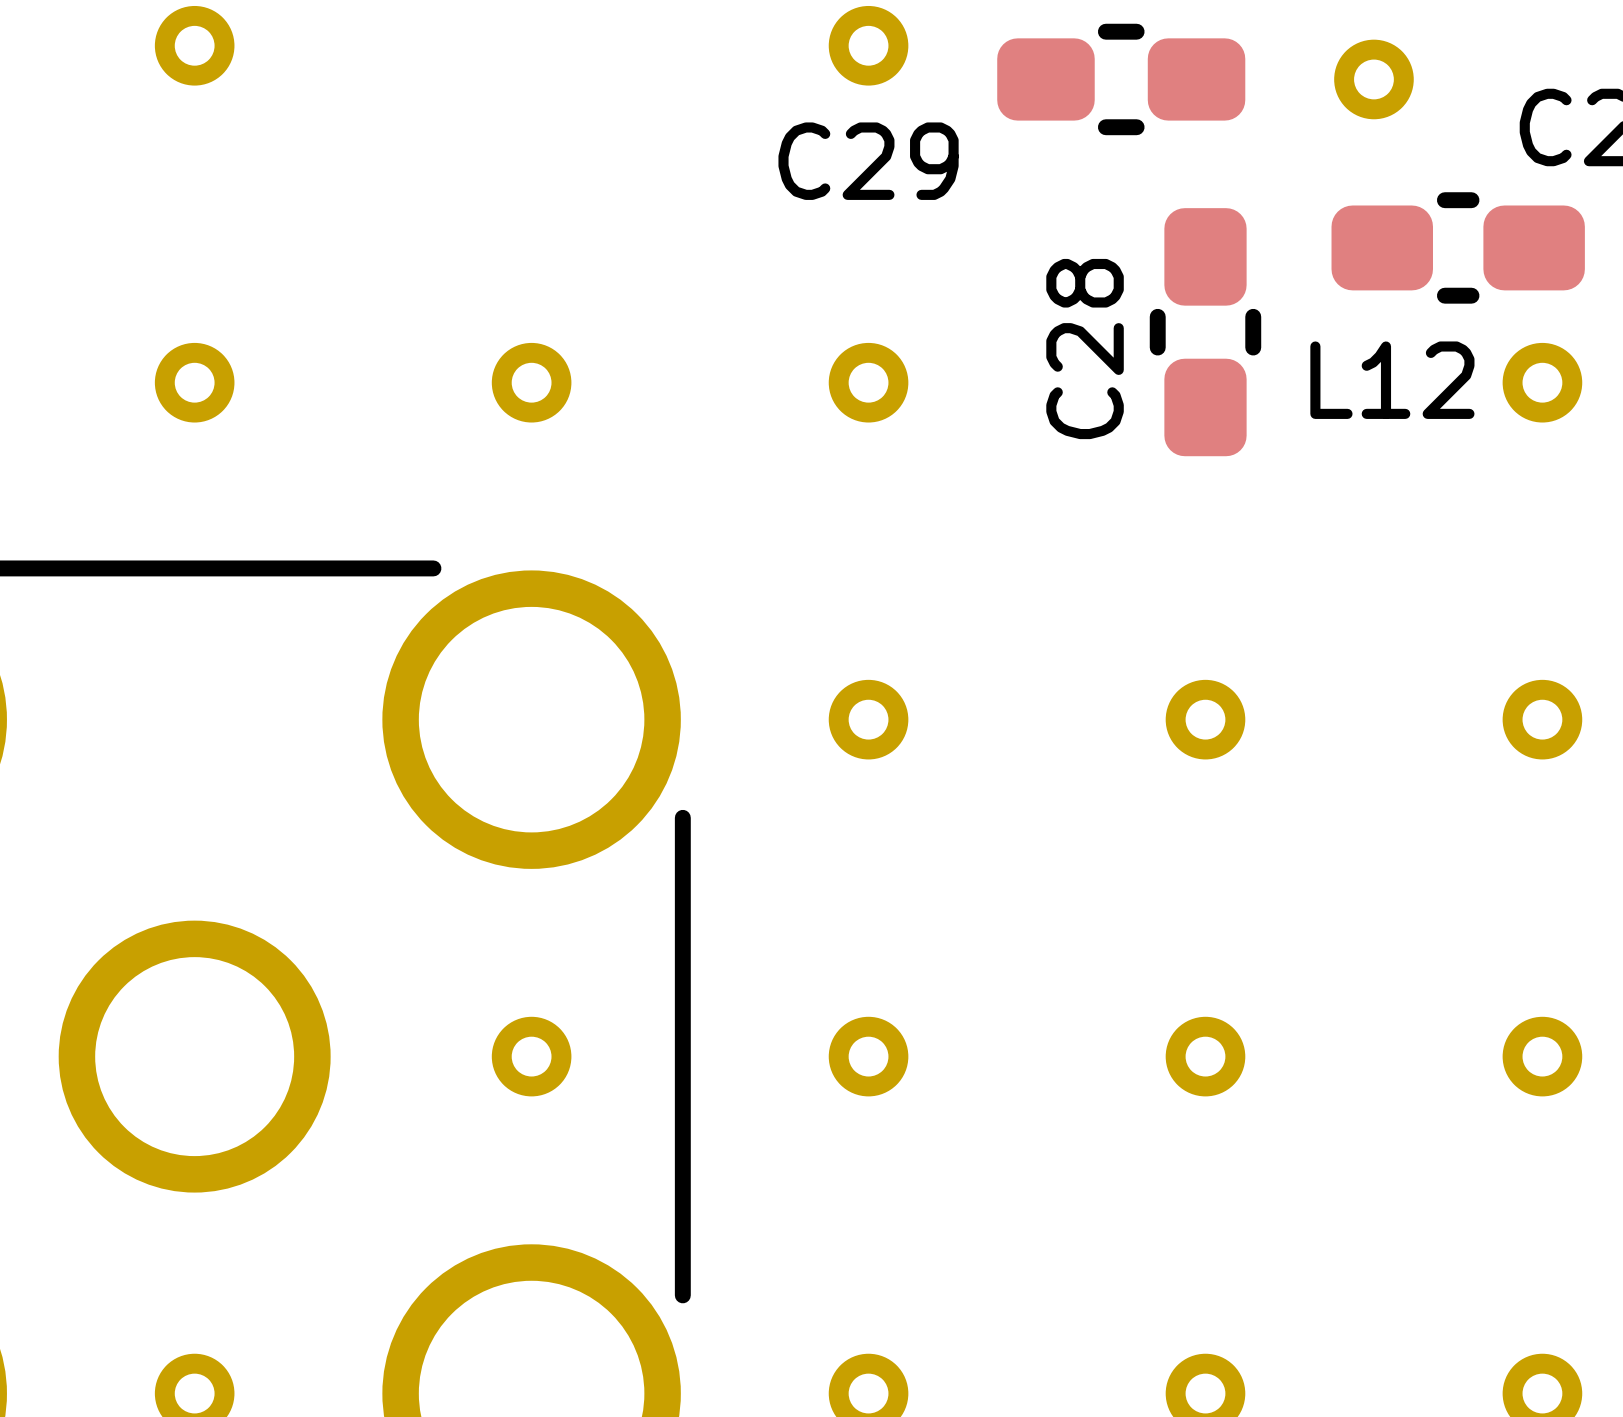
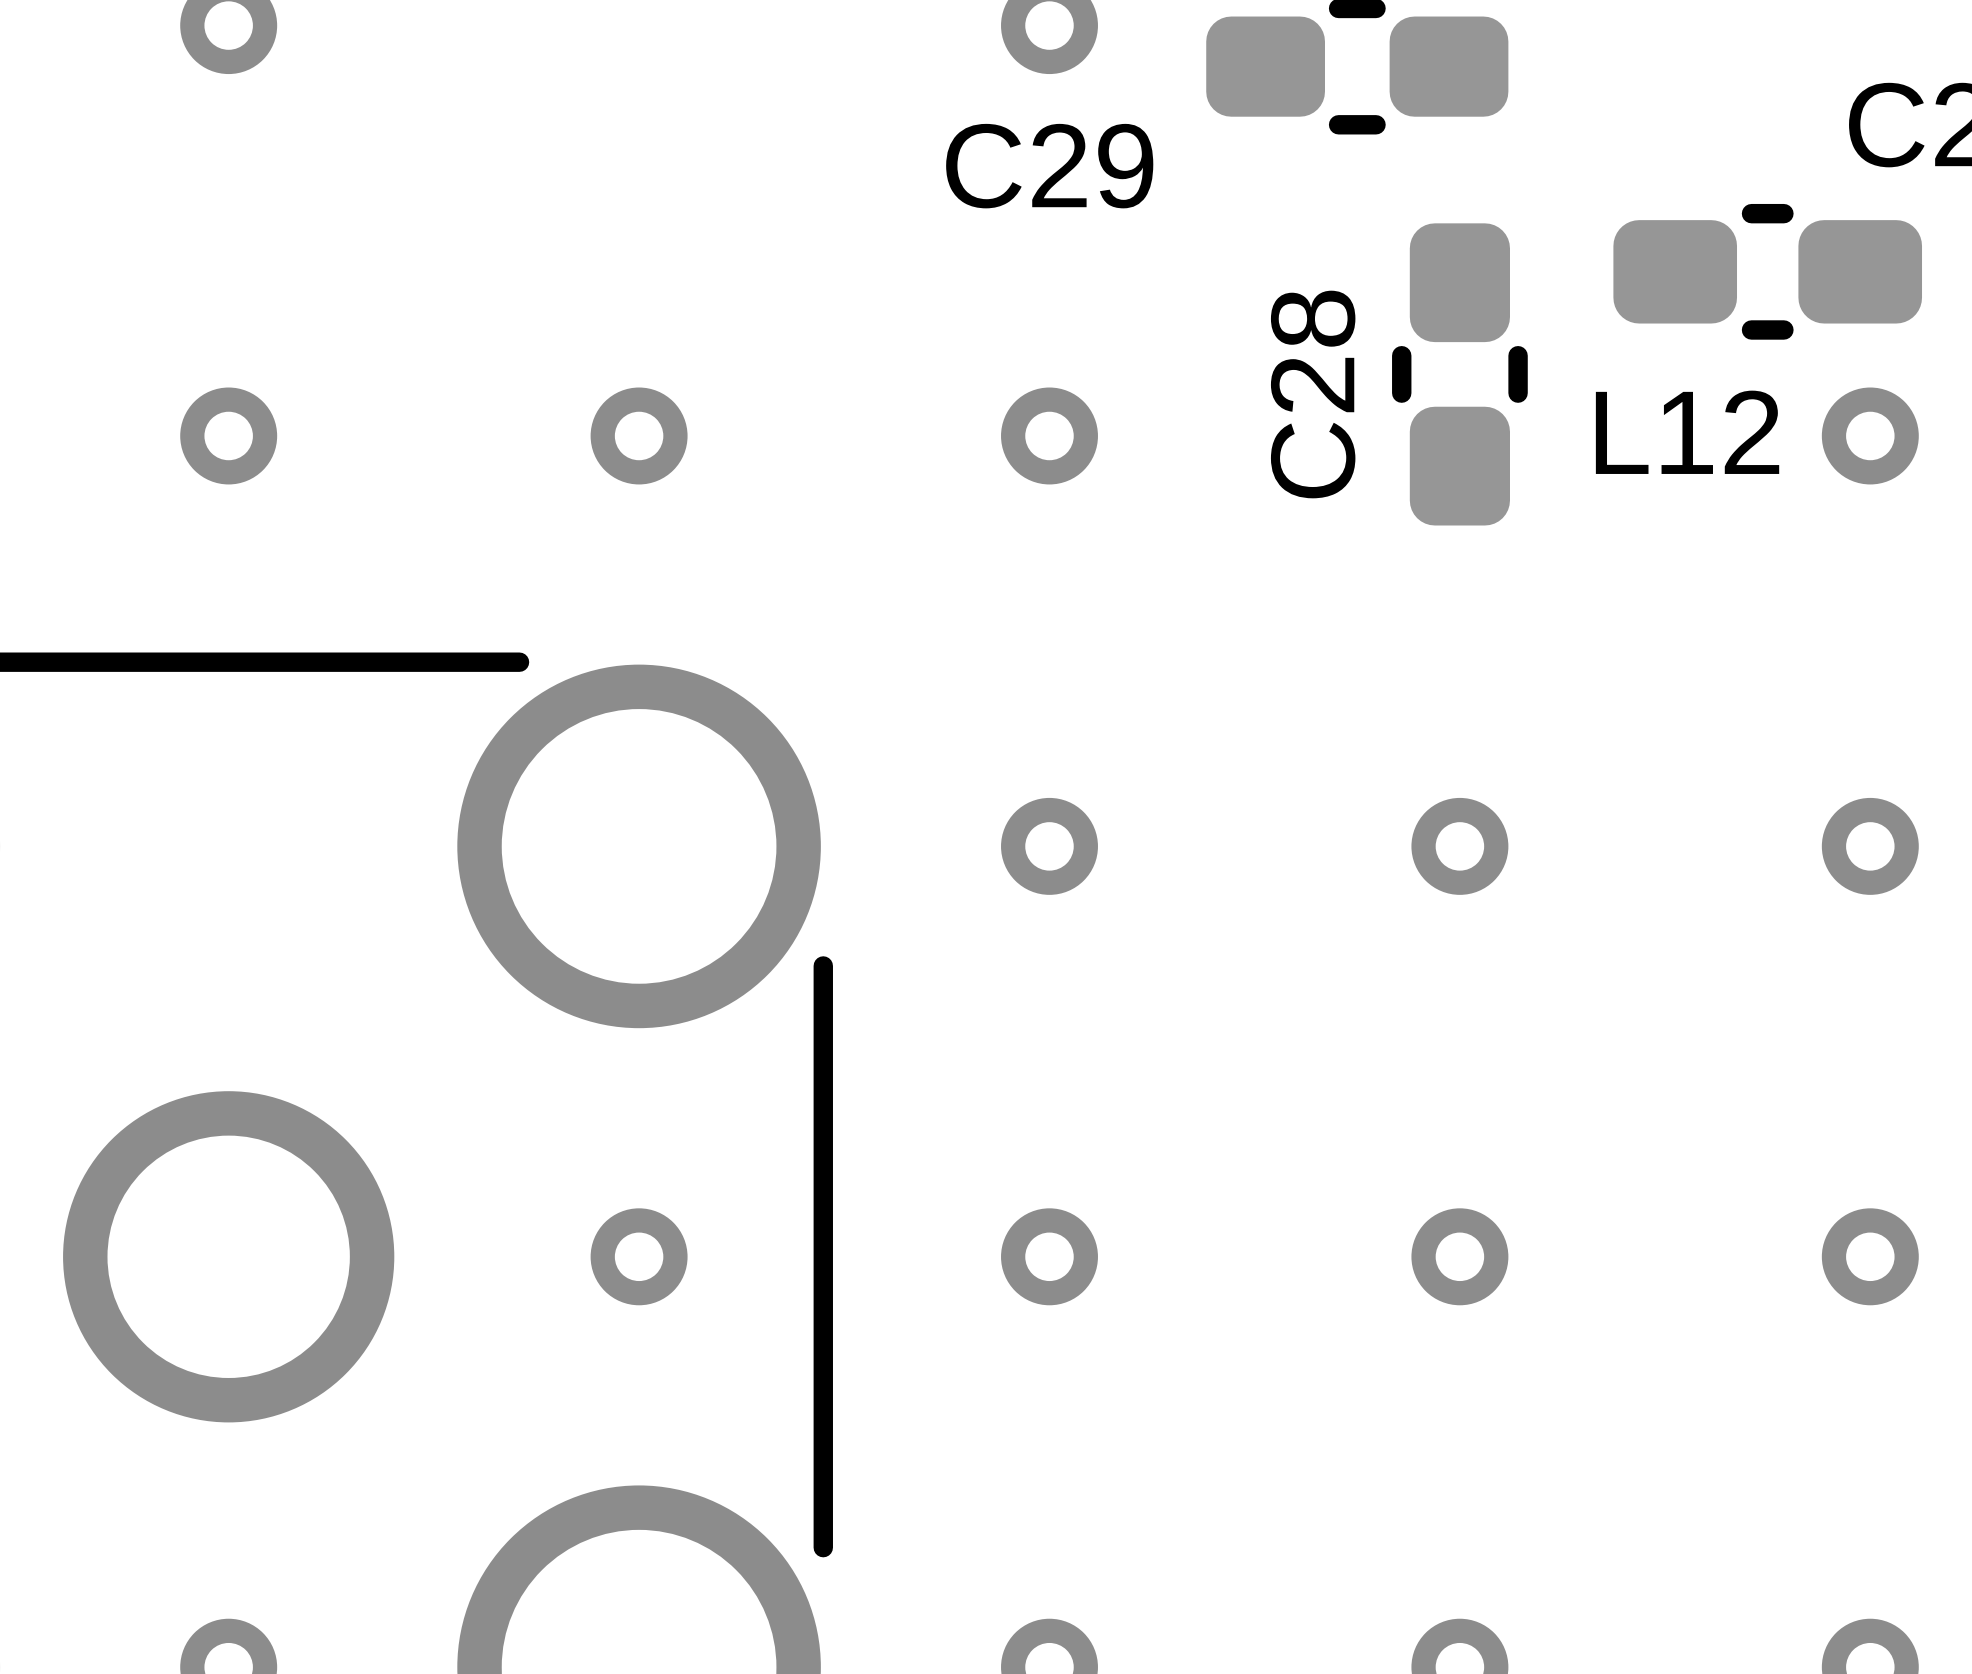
part: (1373, 79) -> none

